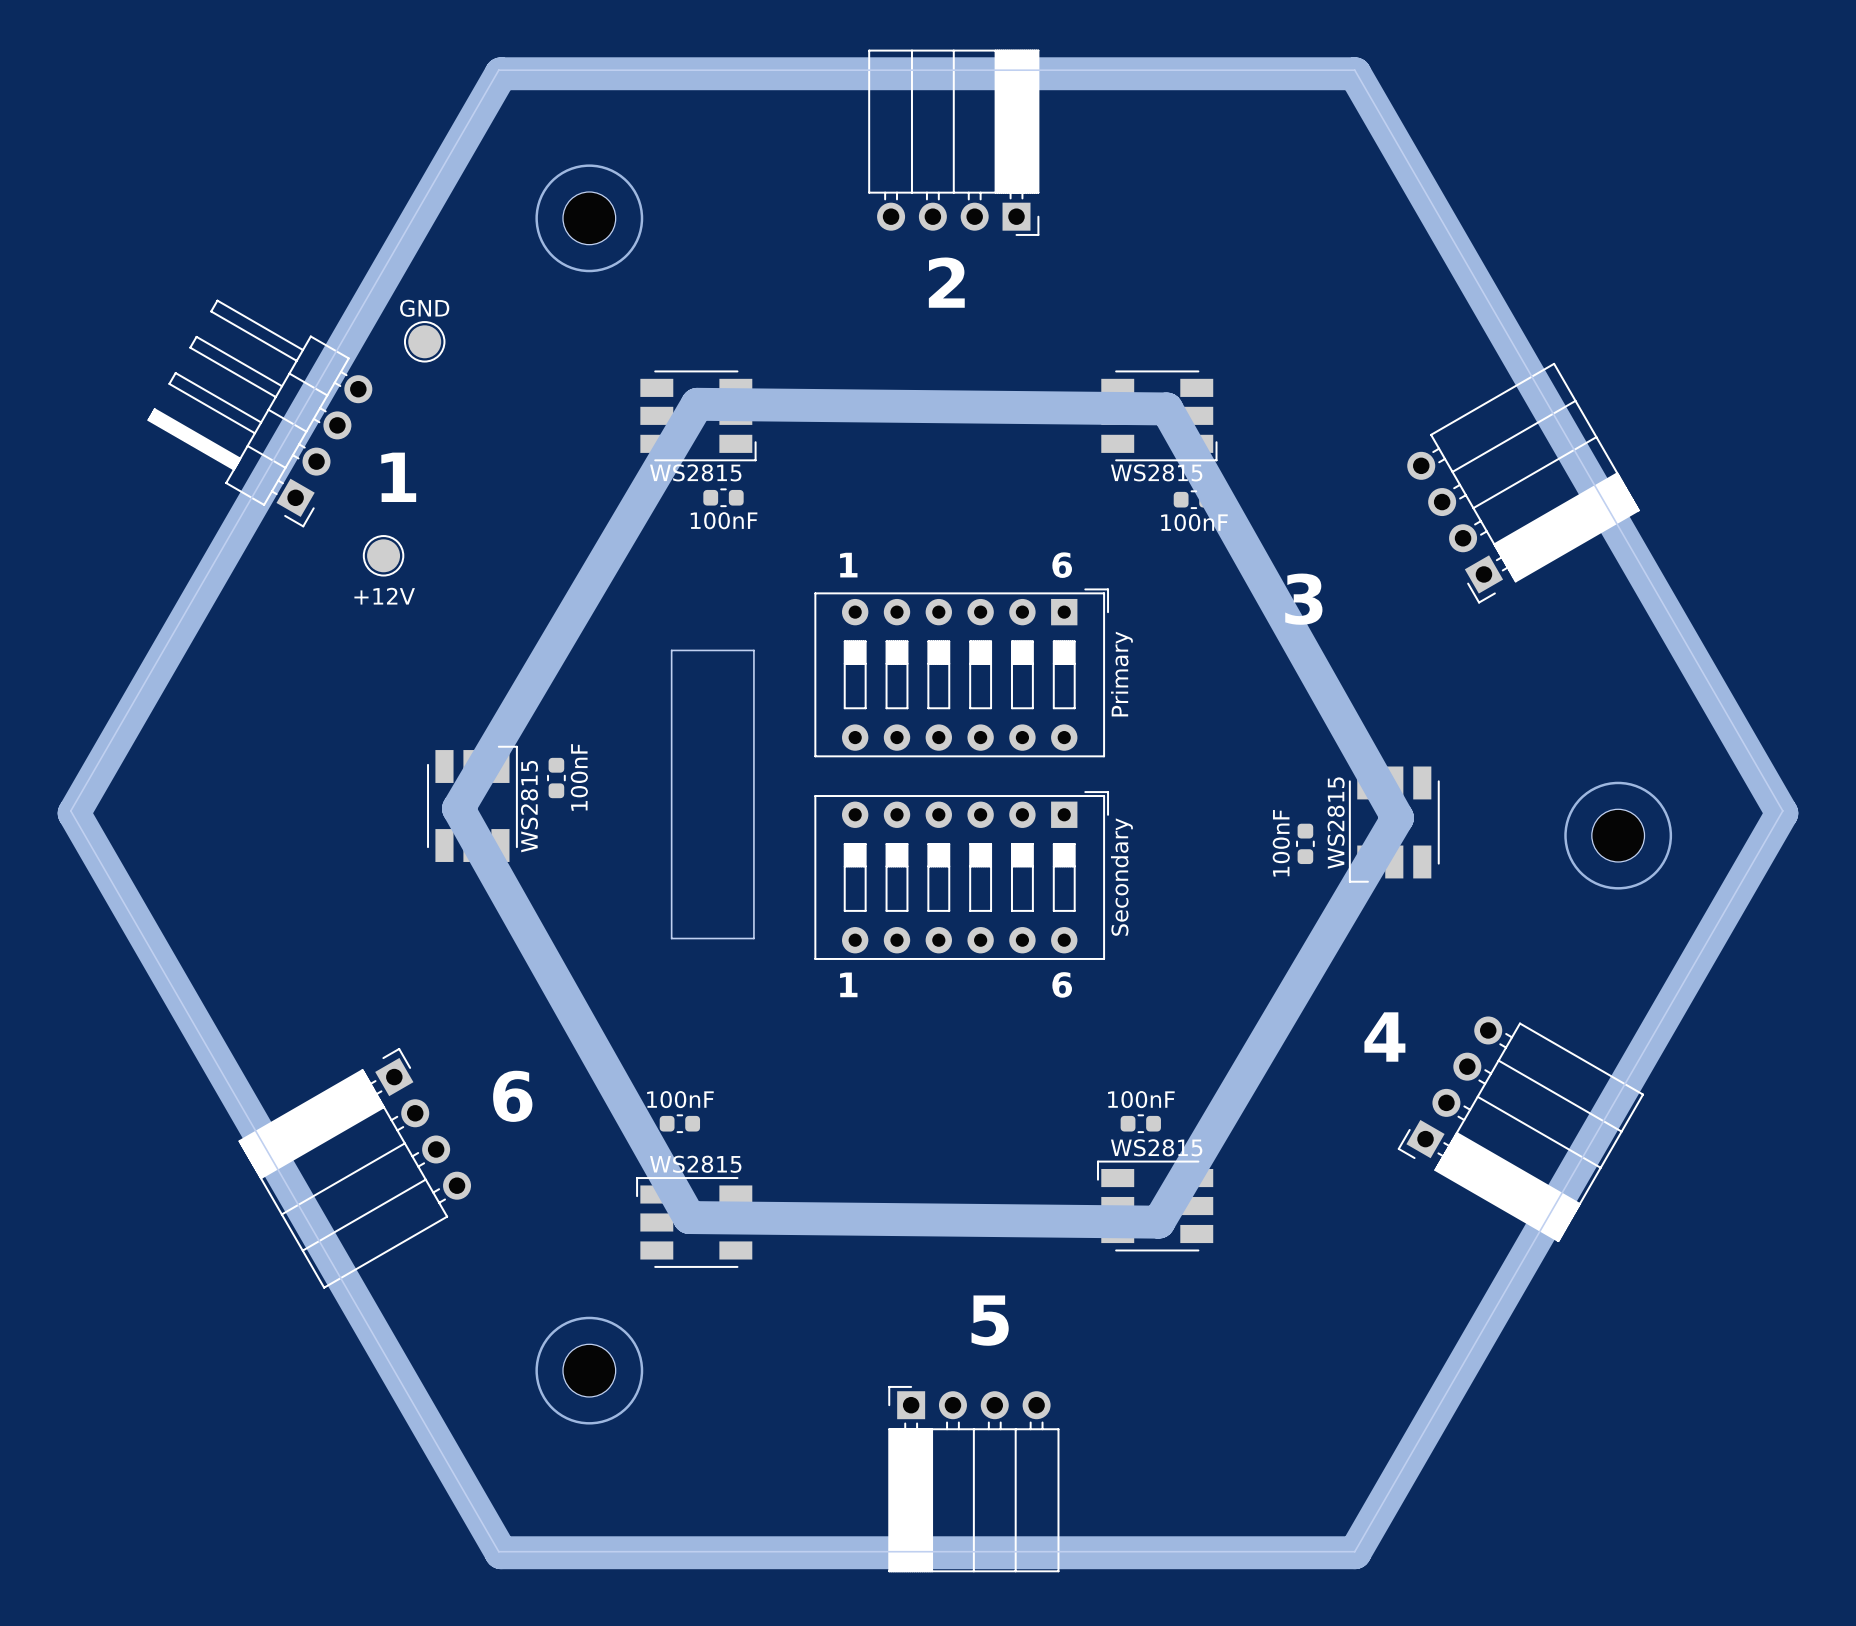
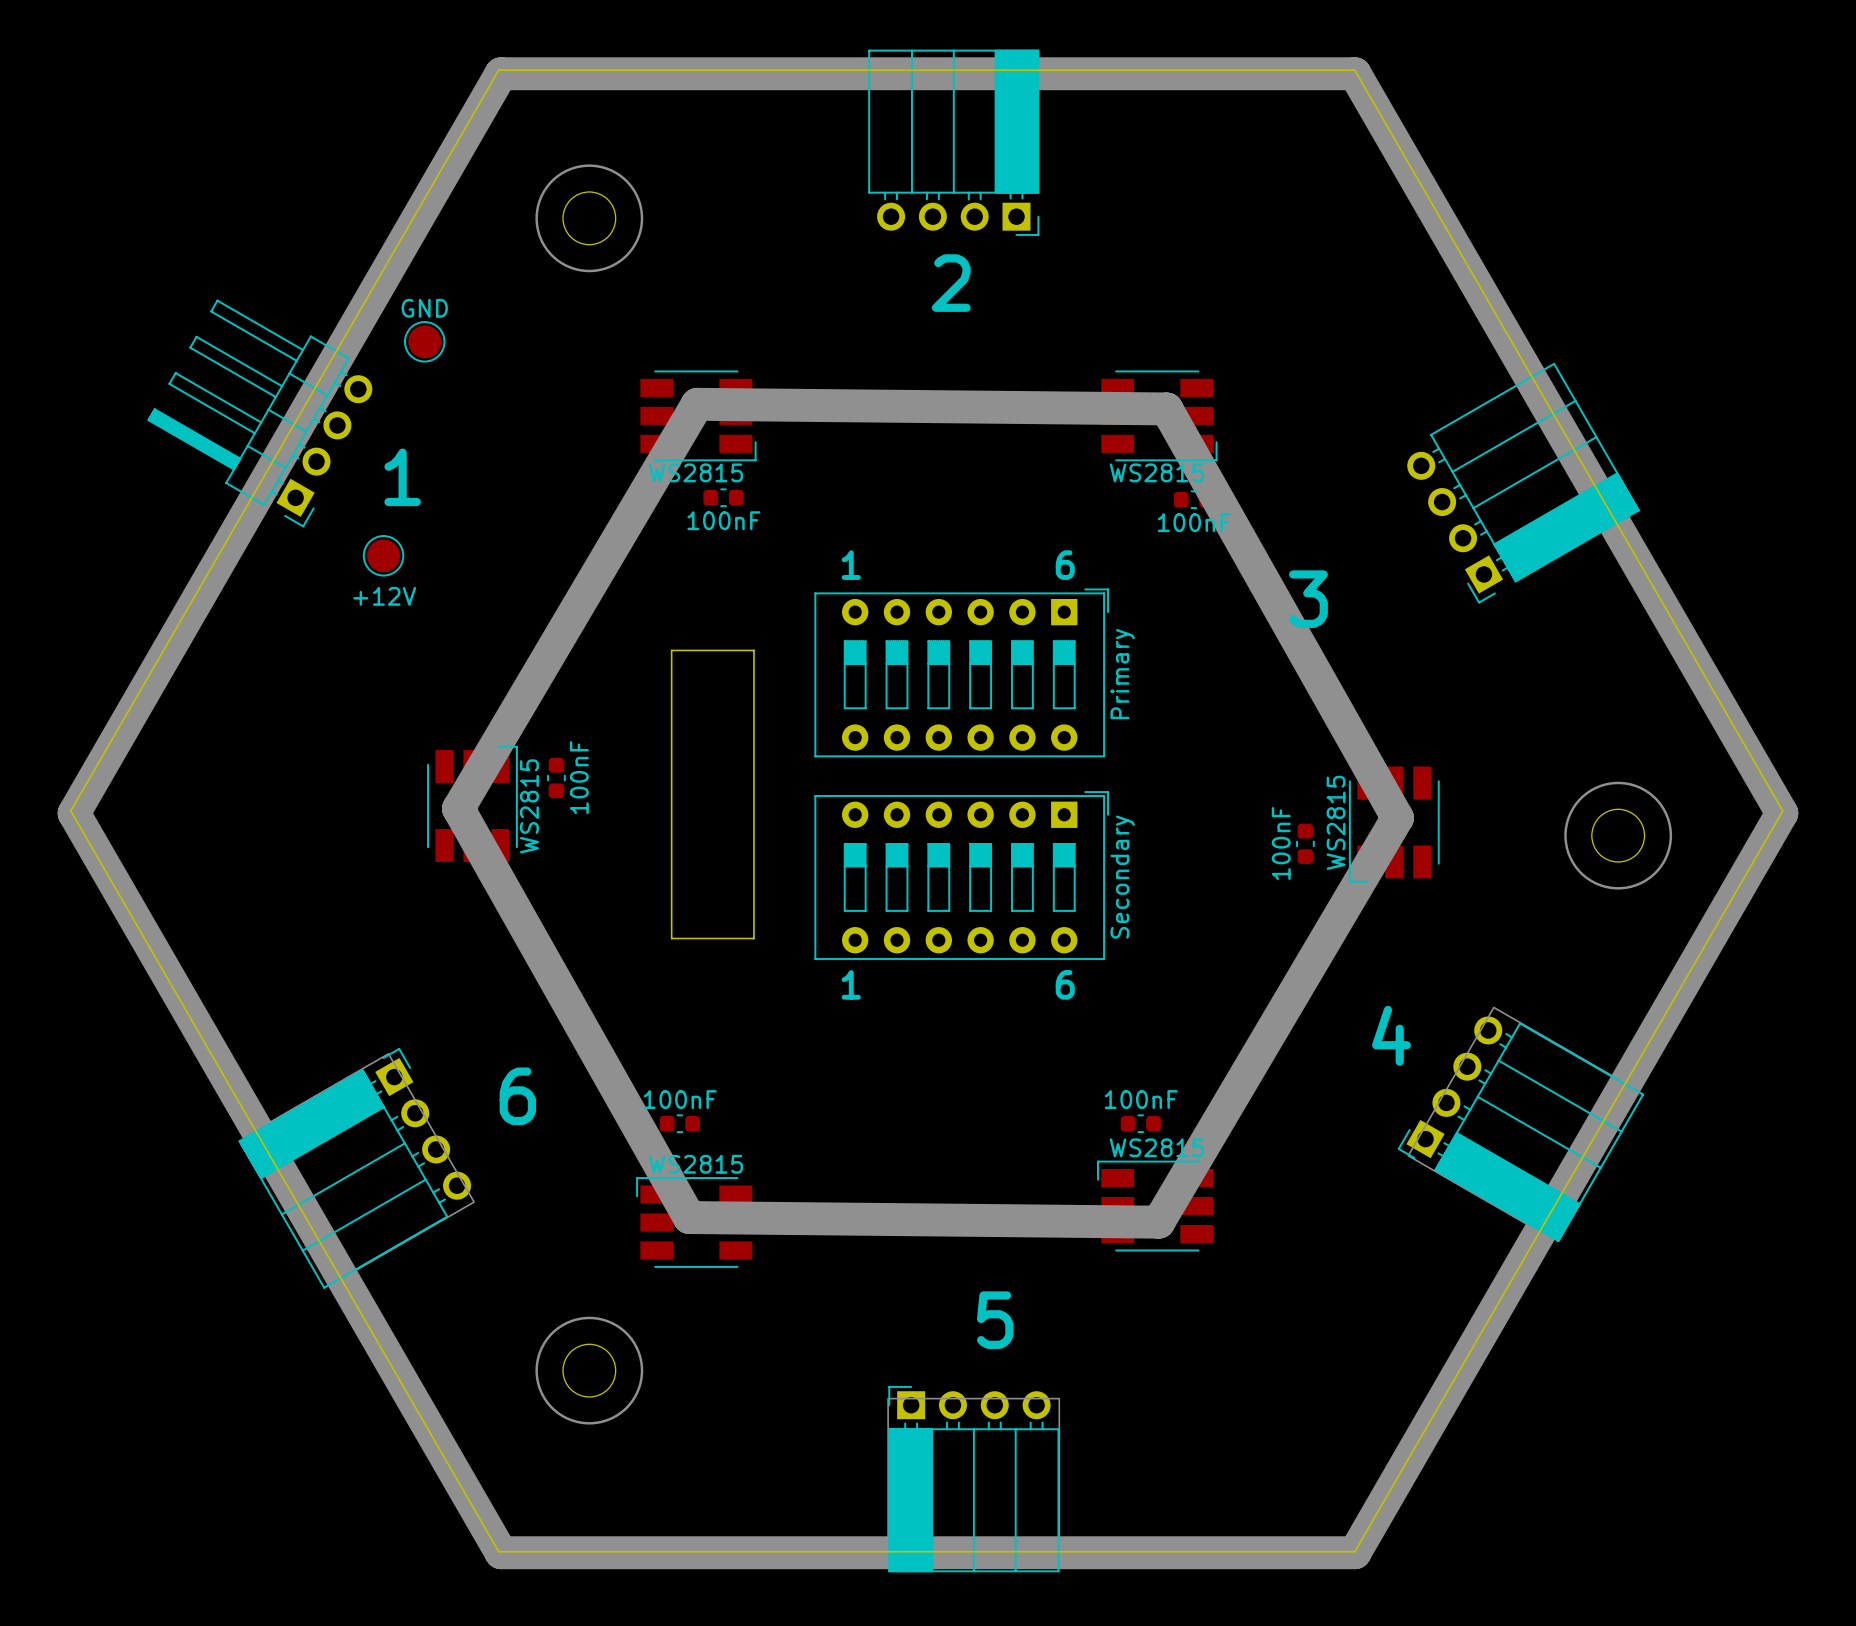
part footprint: [1397, 1016, 1645, 1243] -> [1397, 1006, 1645, 1243]
part footprint: [238, 1047, 472, 1289] -> [238, 1047, 475, 1289]
part footprint: [888, 1385, 1060, 1573] -> [887, 1385, 1061, 1573]

